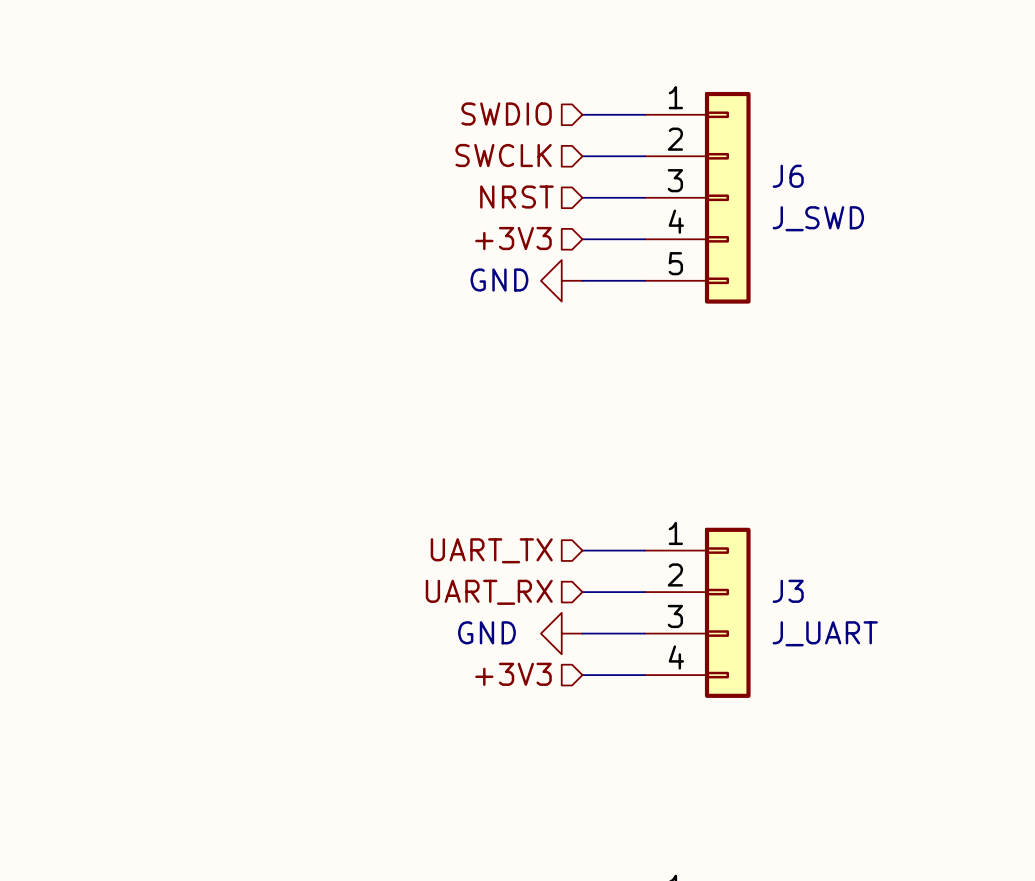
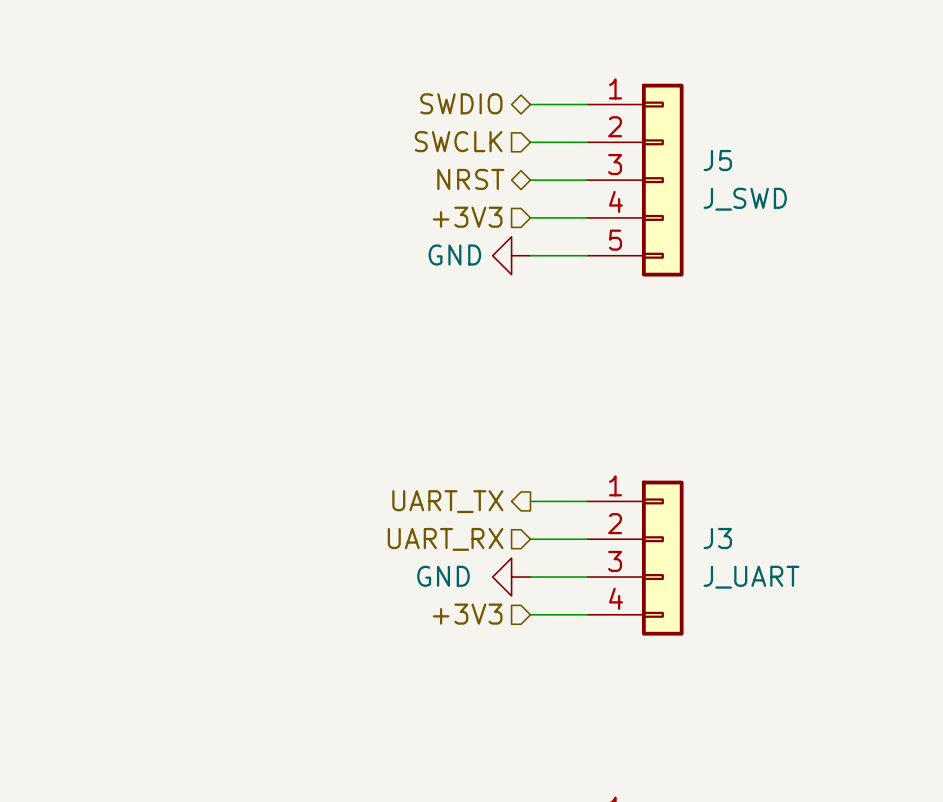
hierarchical label shape: input (506, 114) -> bidirectional (461, 103)
J6 name: J6 (788, 176) -> J5 (717, 160)
hierarchical label shape: input (516, 197) -> bidirectional (470, 179)
hierarchical label shape: input (491, 550) -> output (447, 501)

